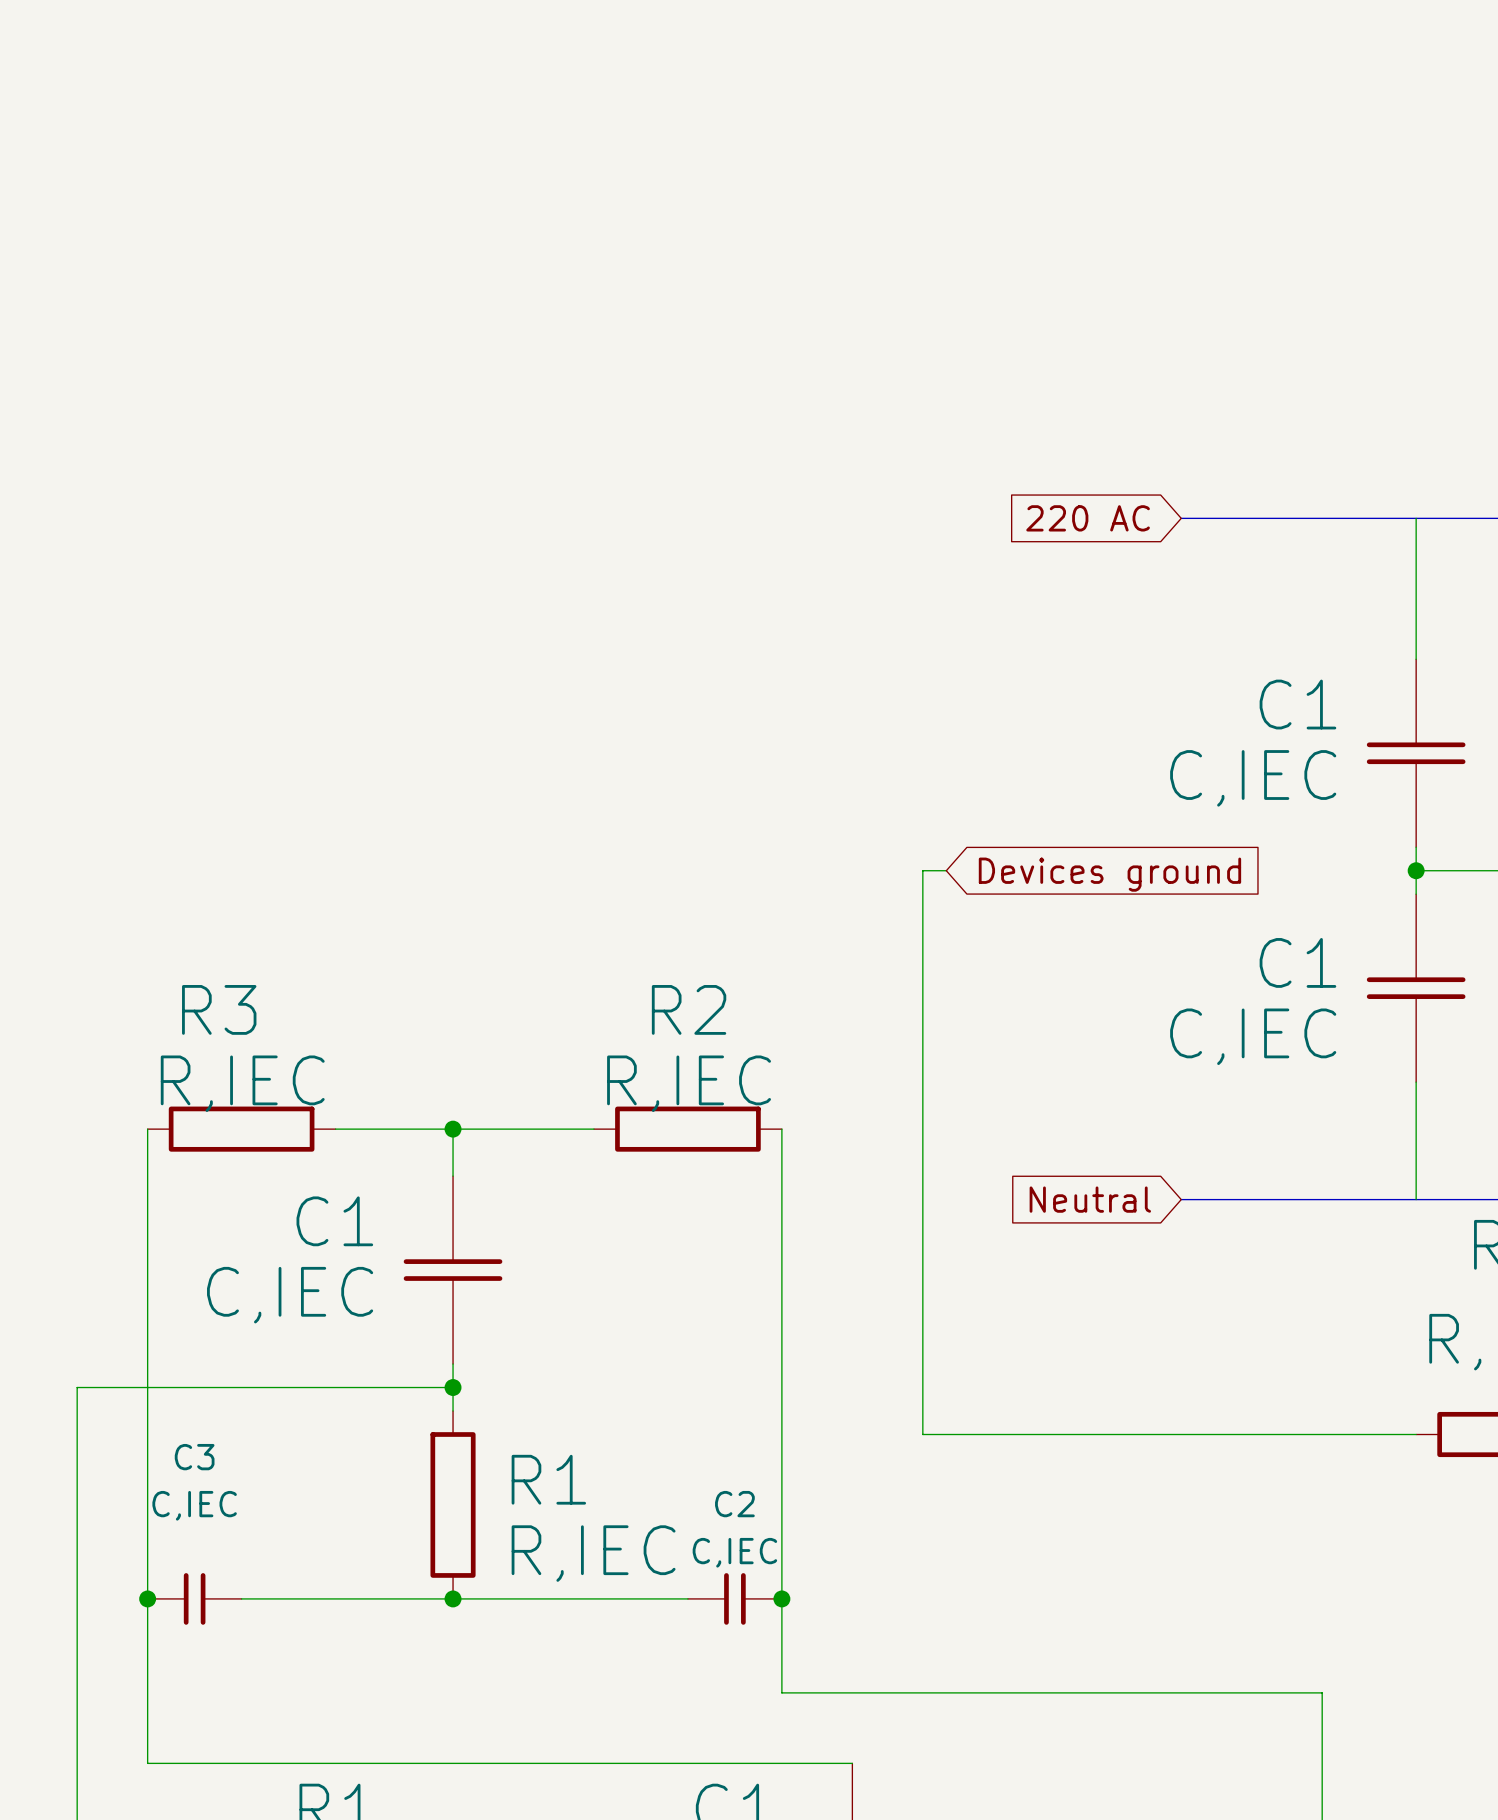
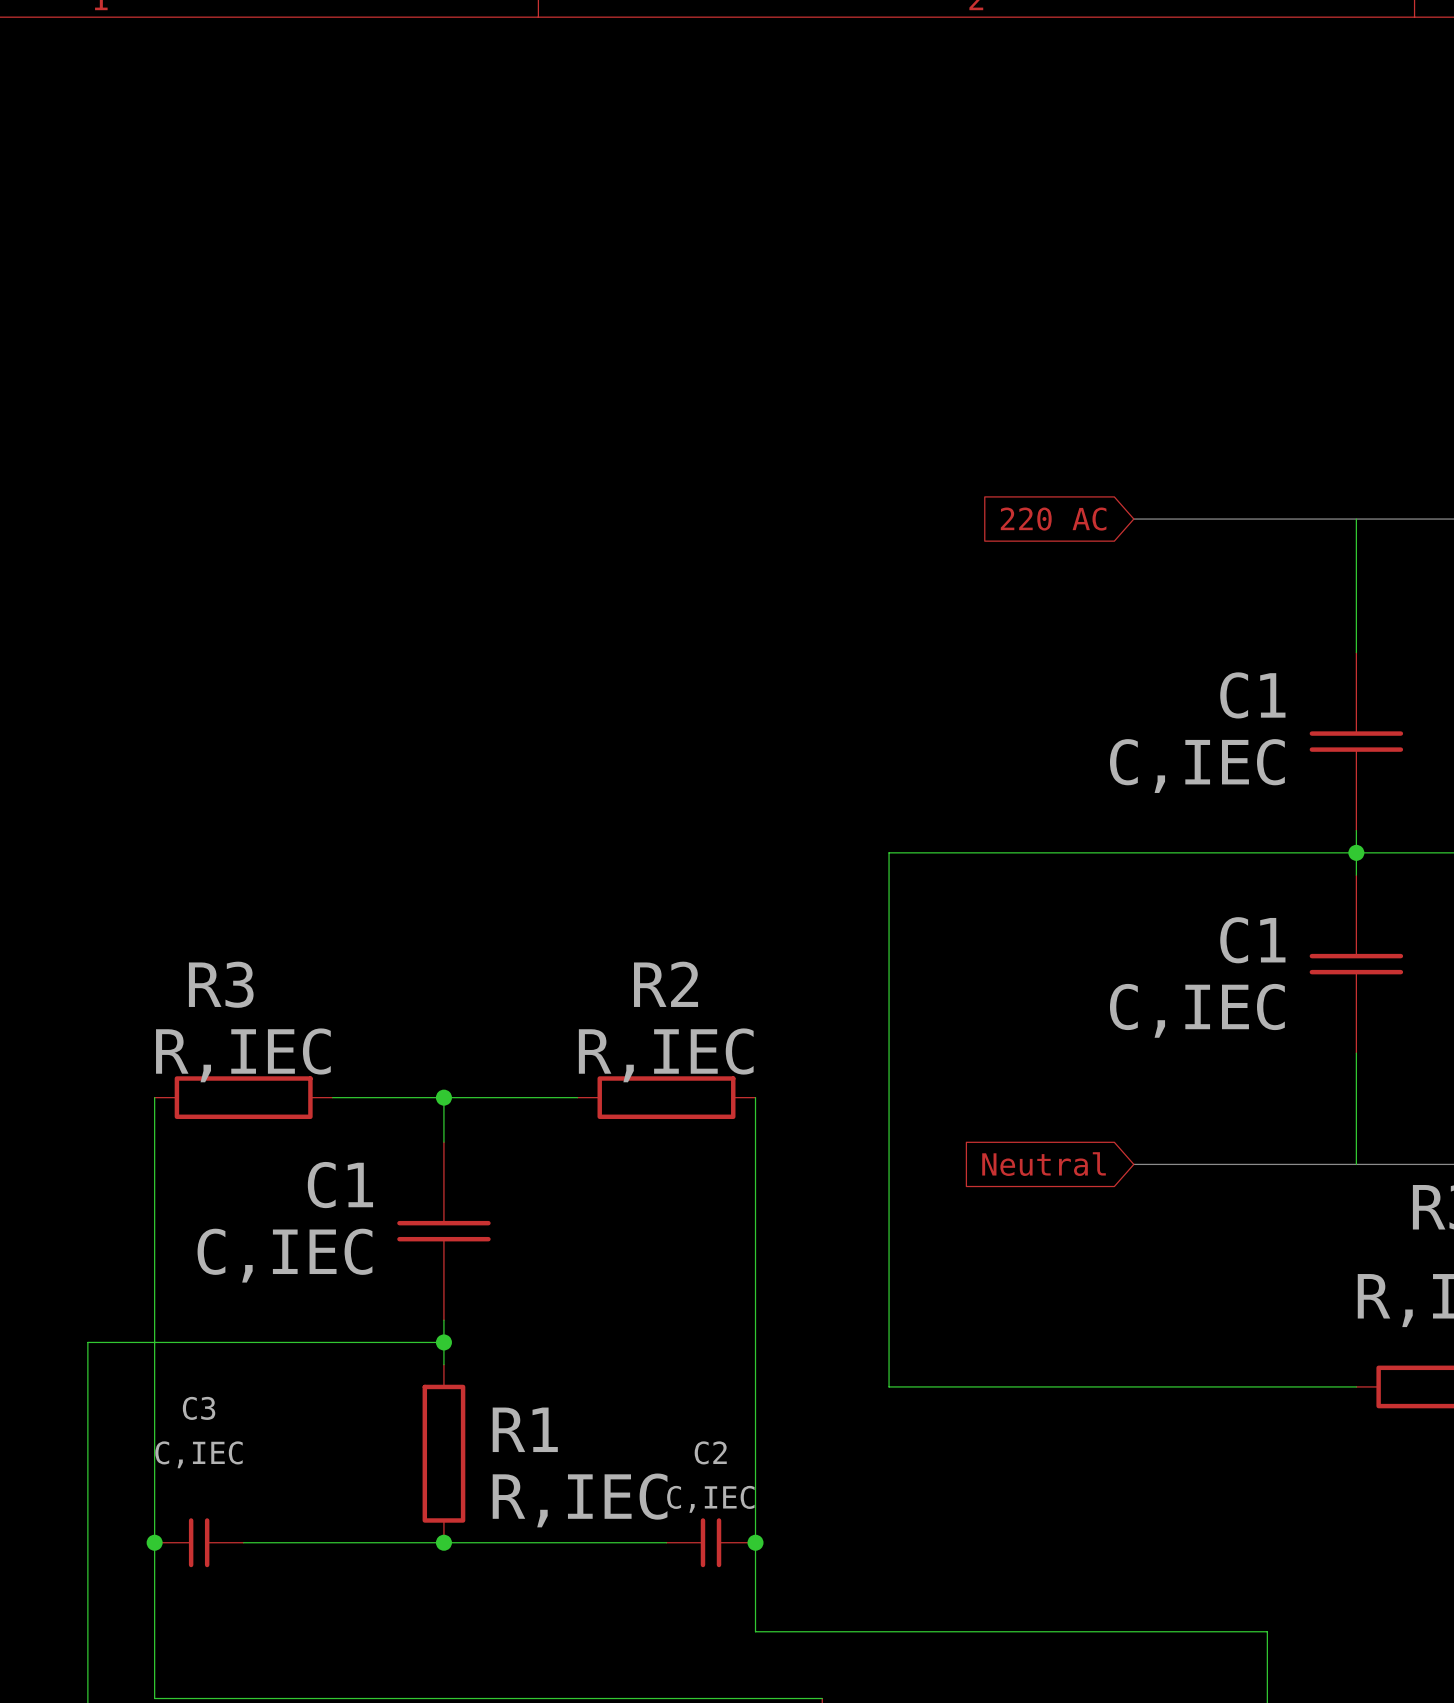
wire: none -> (911, 852) (1356, 852)
global label: Devices ground (1109, 874) -> none

